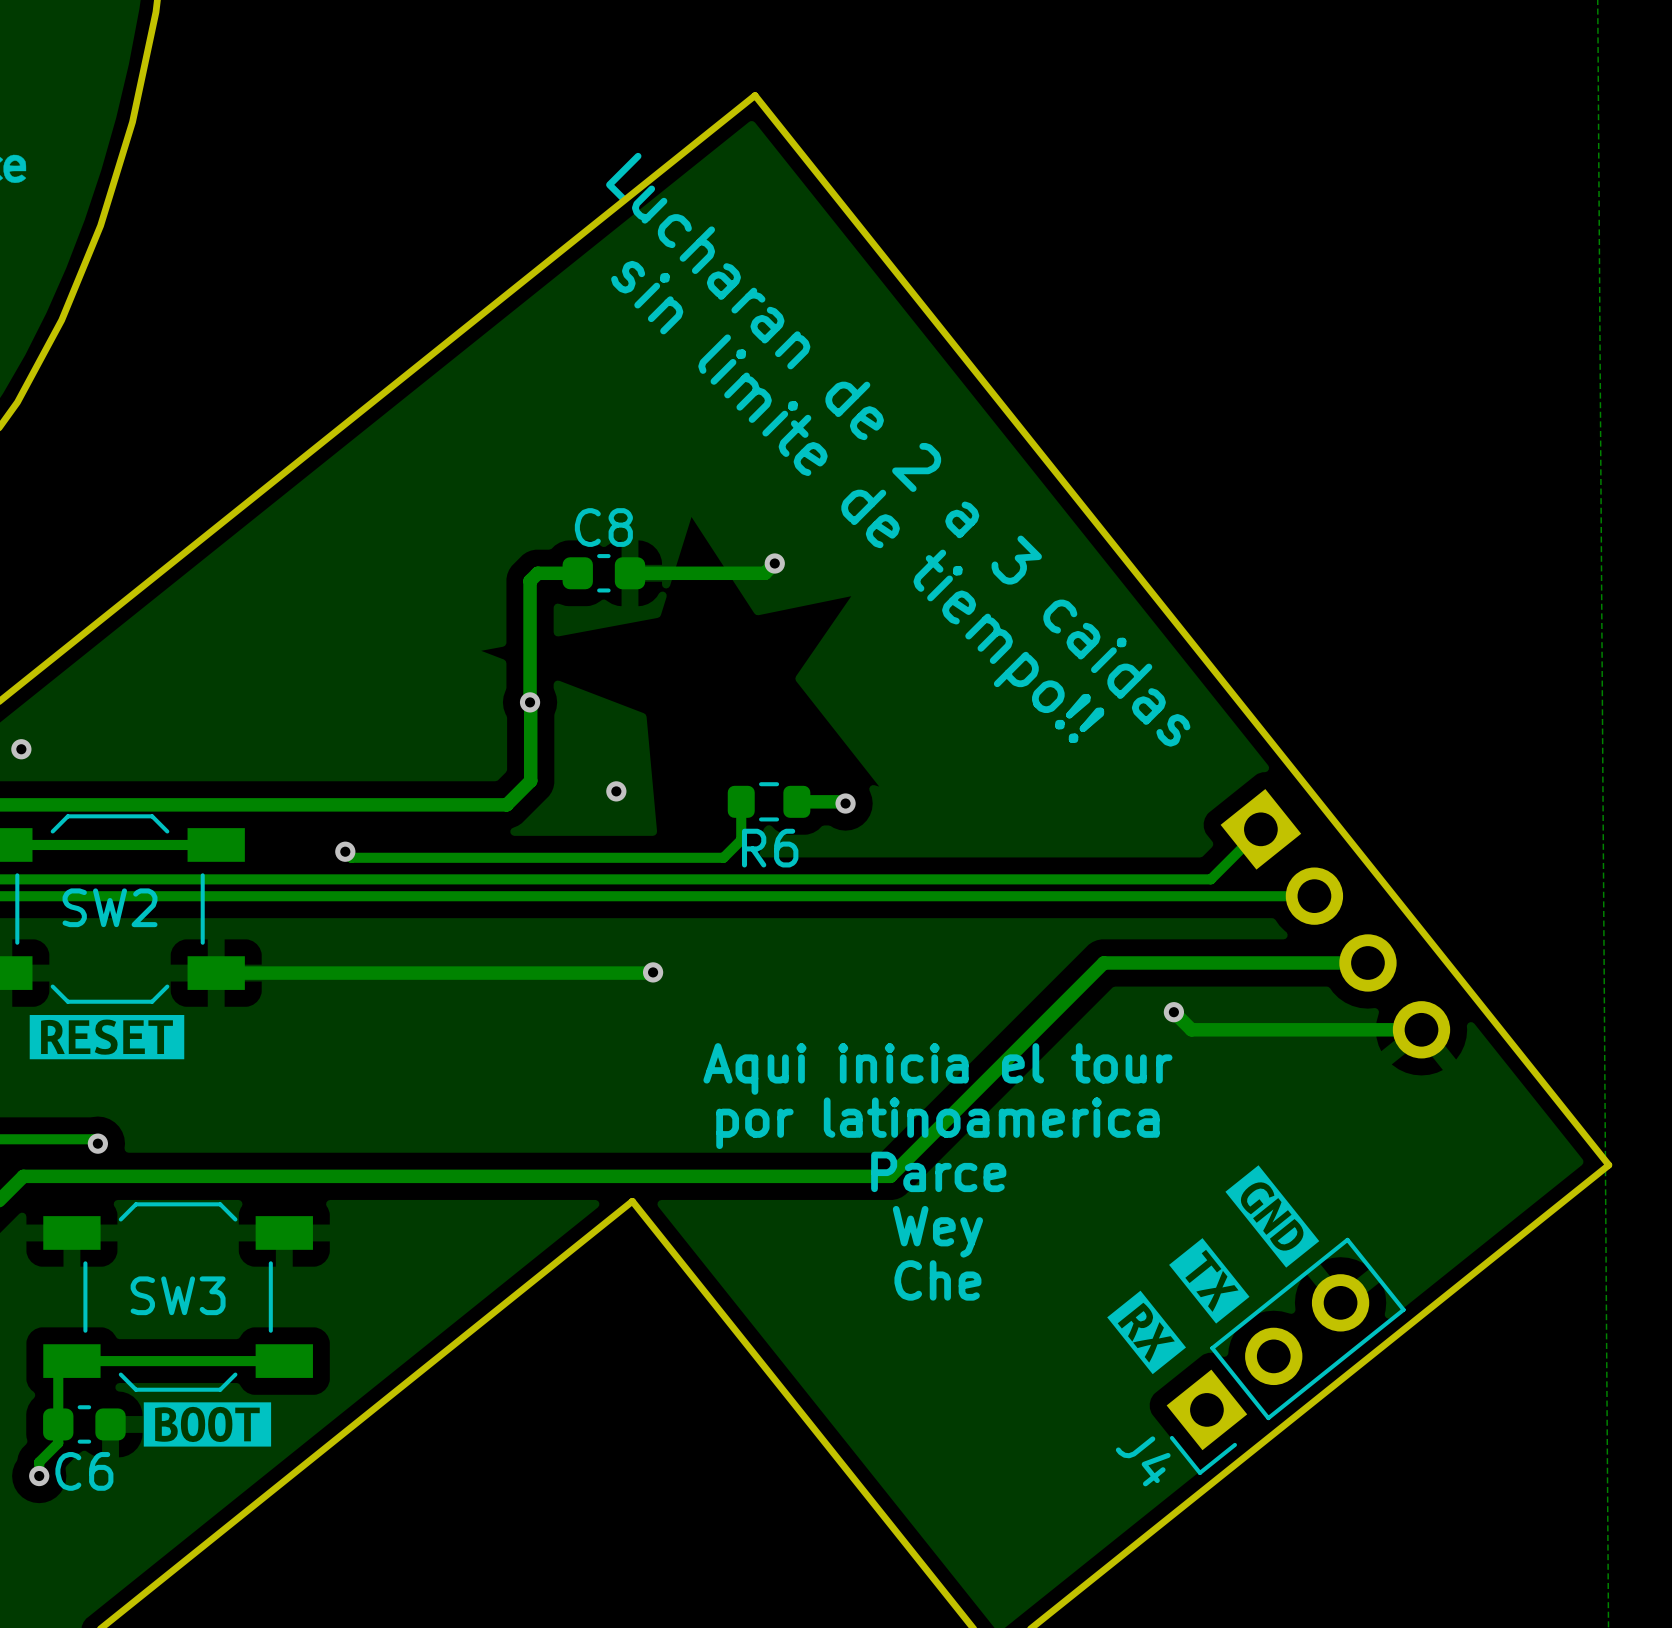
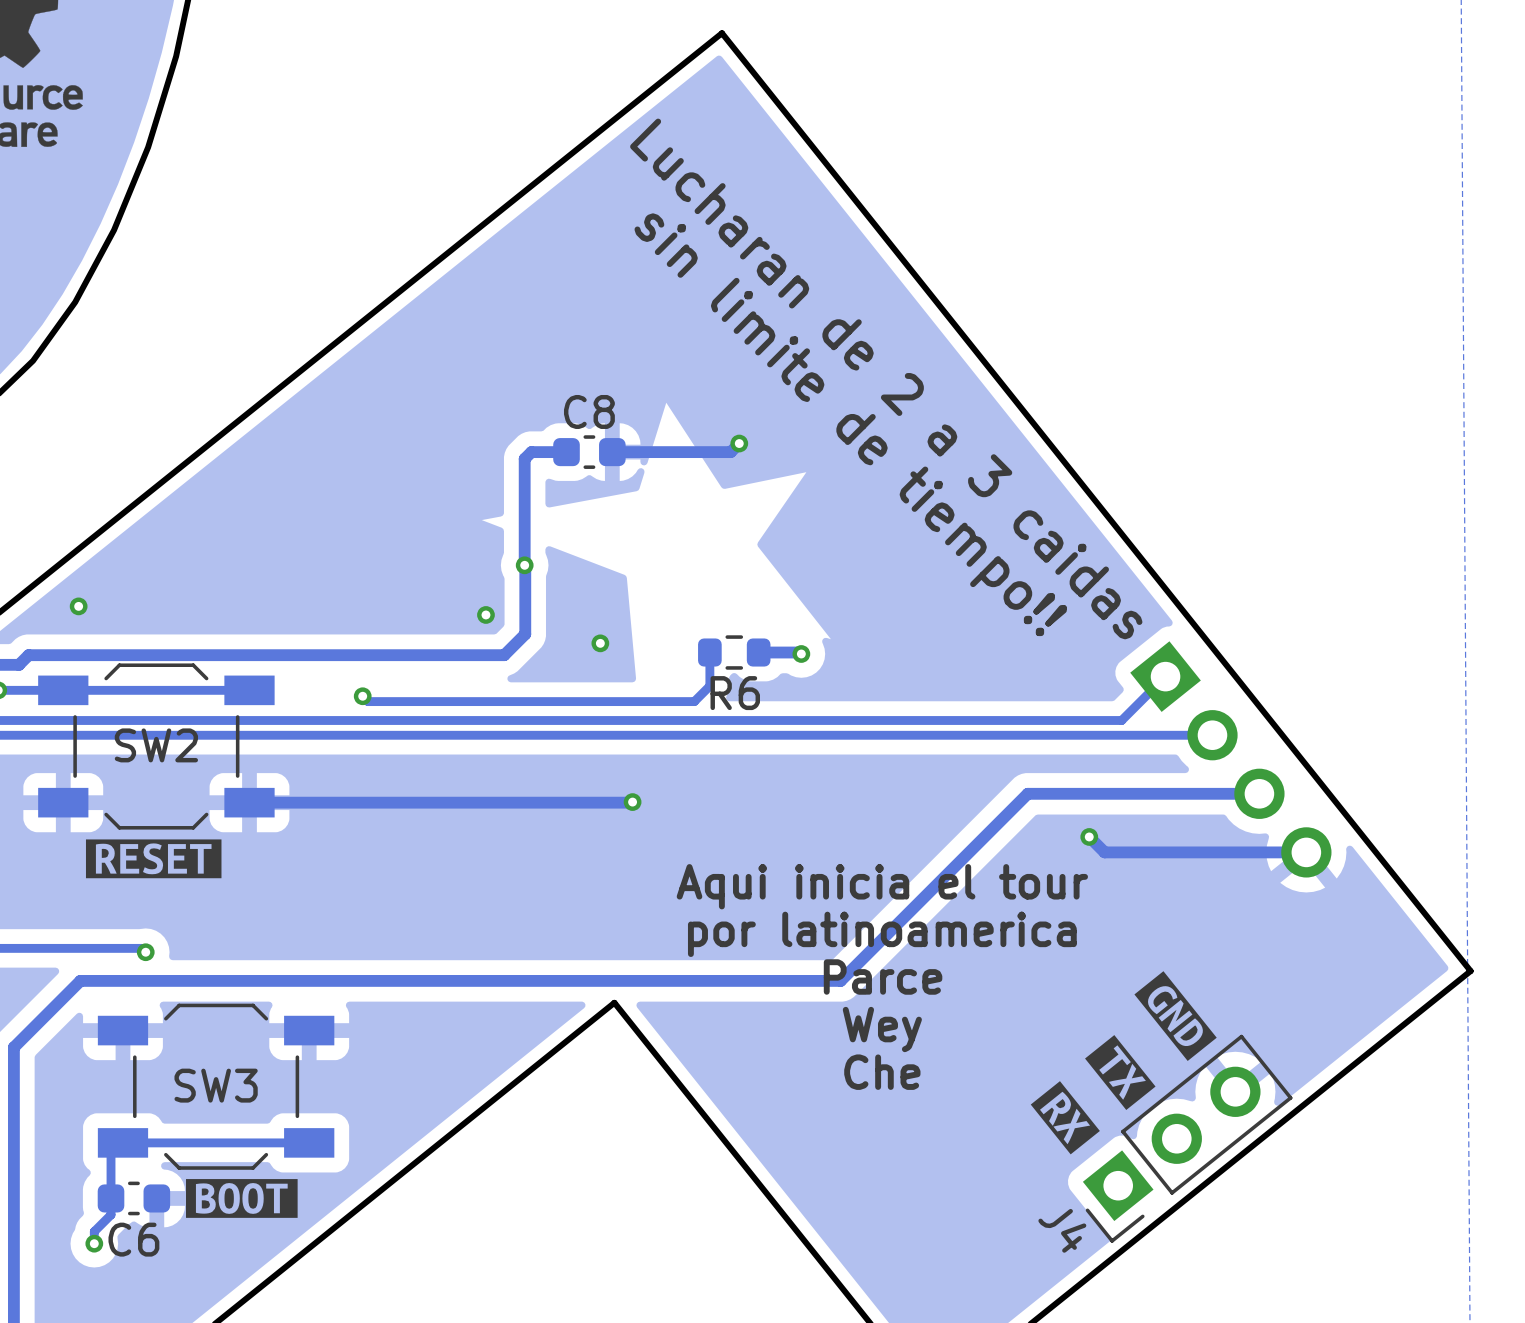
text position: Lucharan de 2 a 3 caidas (898, 449) -> Lucharan de 2 a 3 caidas (886, 378)
text position: sin limite de tiempo!! (857, 501) -> sin limite de tiempo!! (850, 424)
via: none -> (485, 614)

